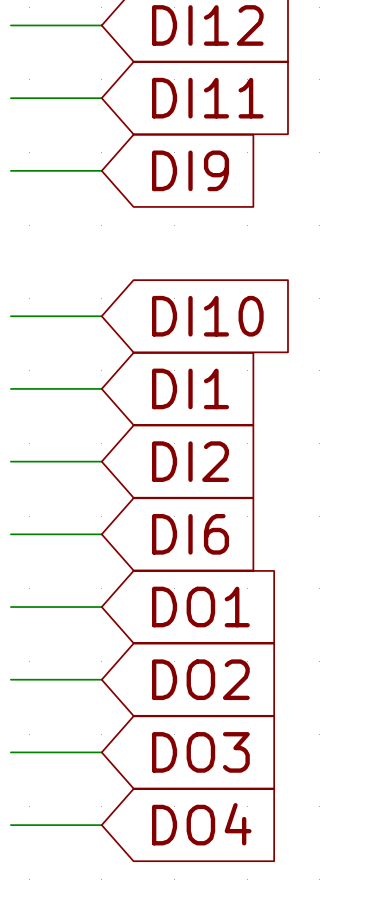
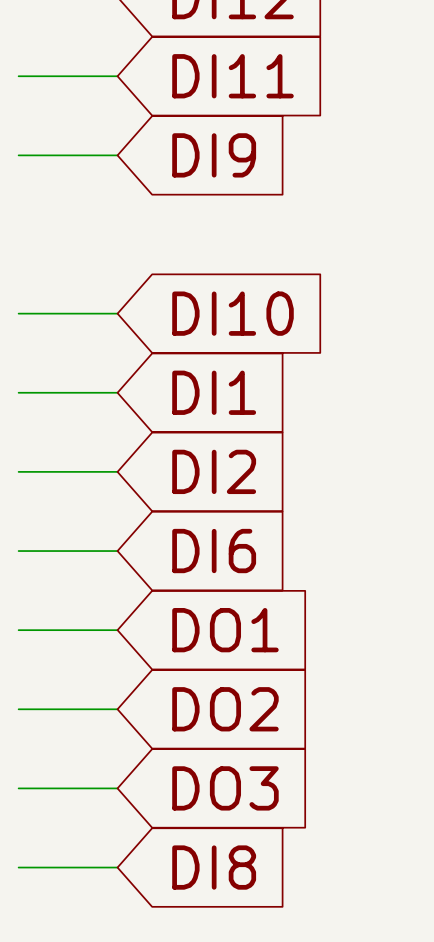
global label: DO4 (201, 824) -> DI8 (214, 867)

